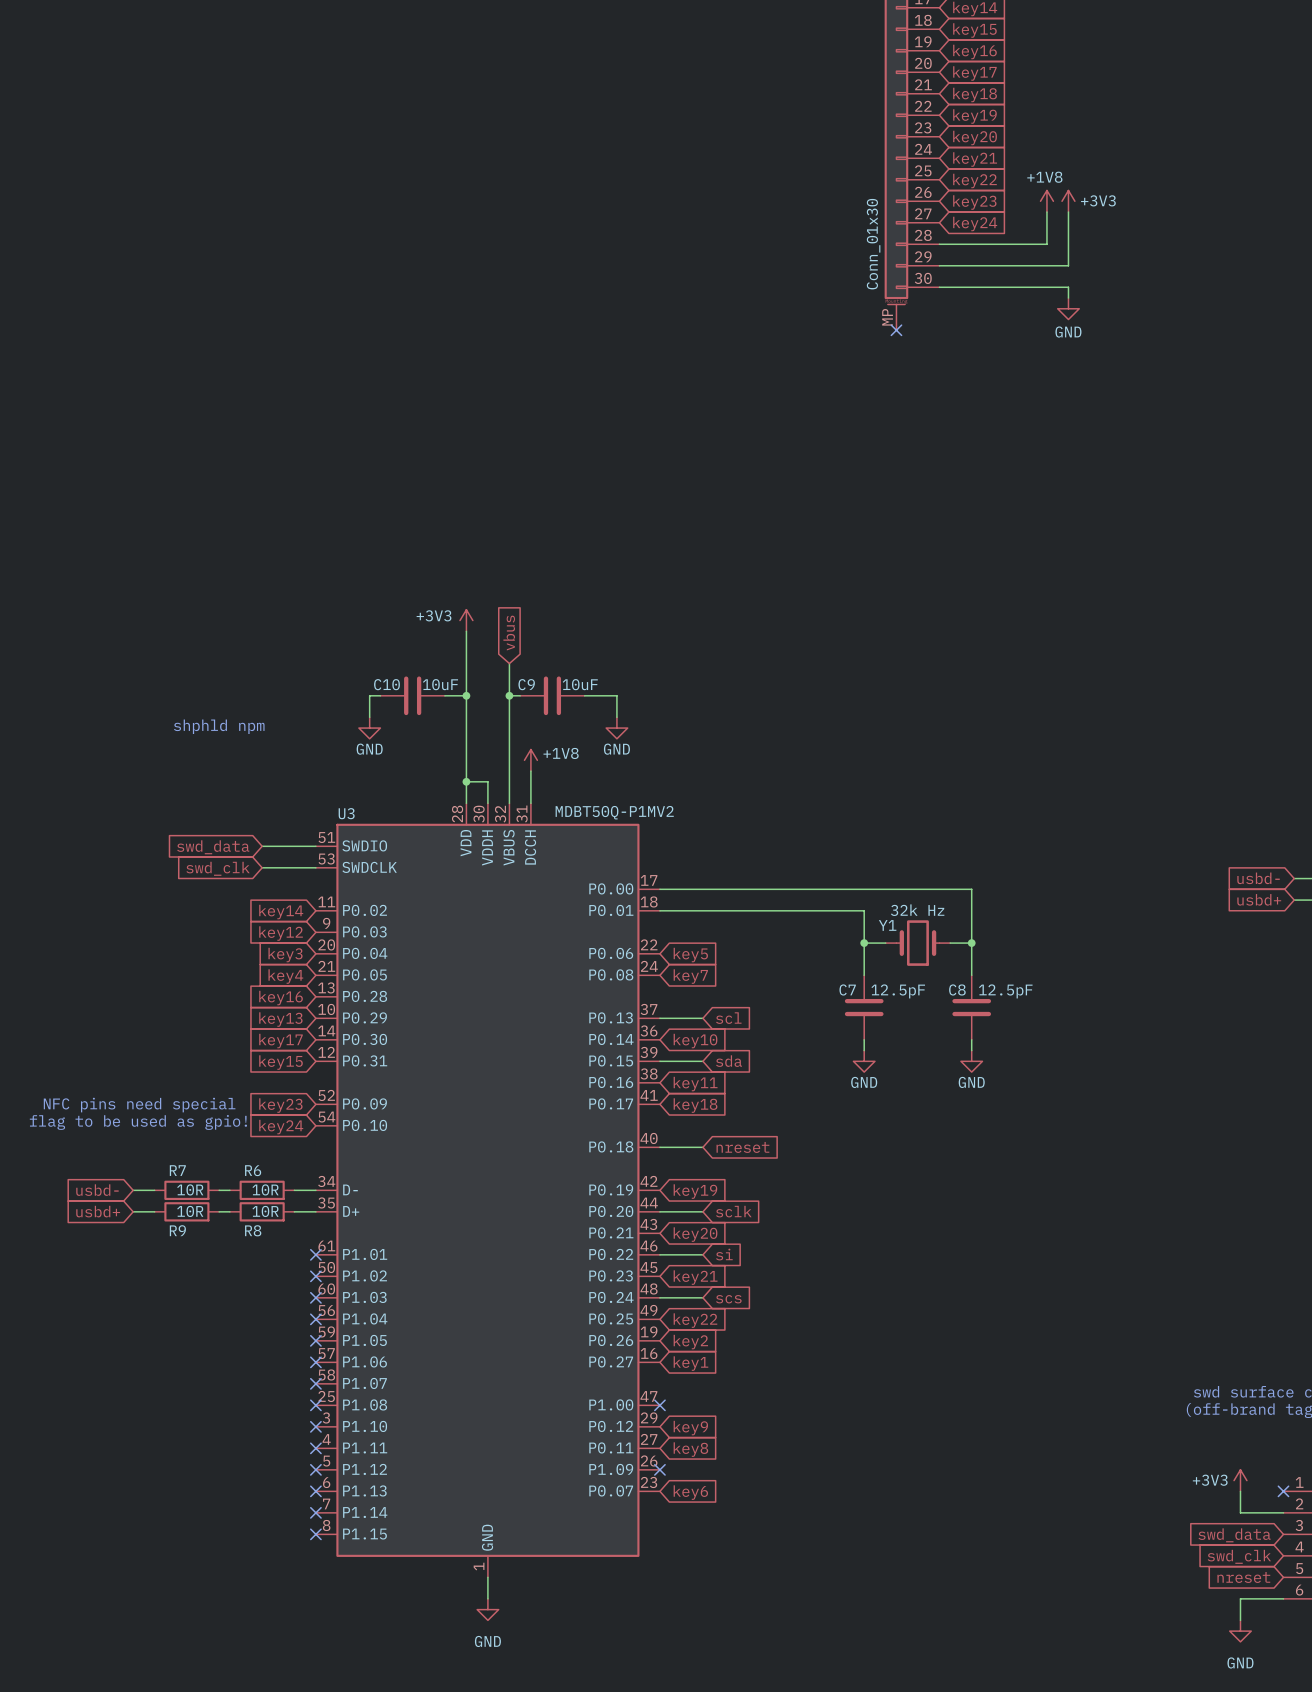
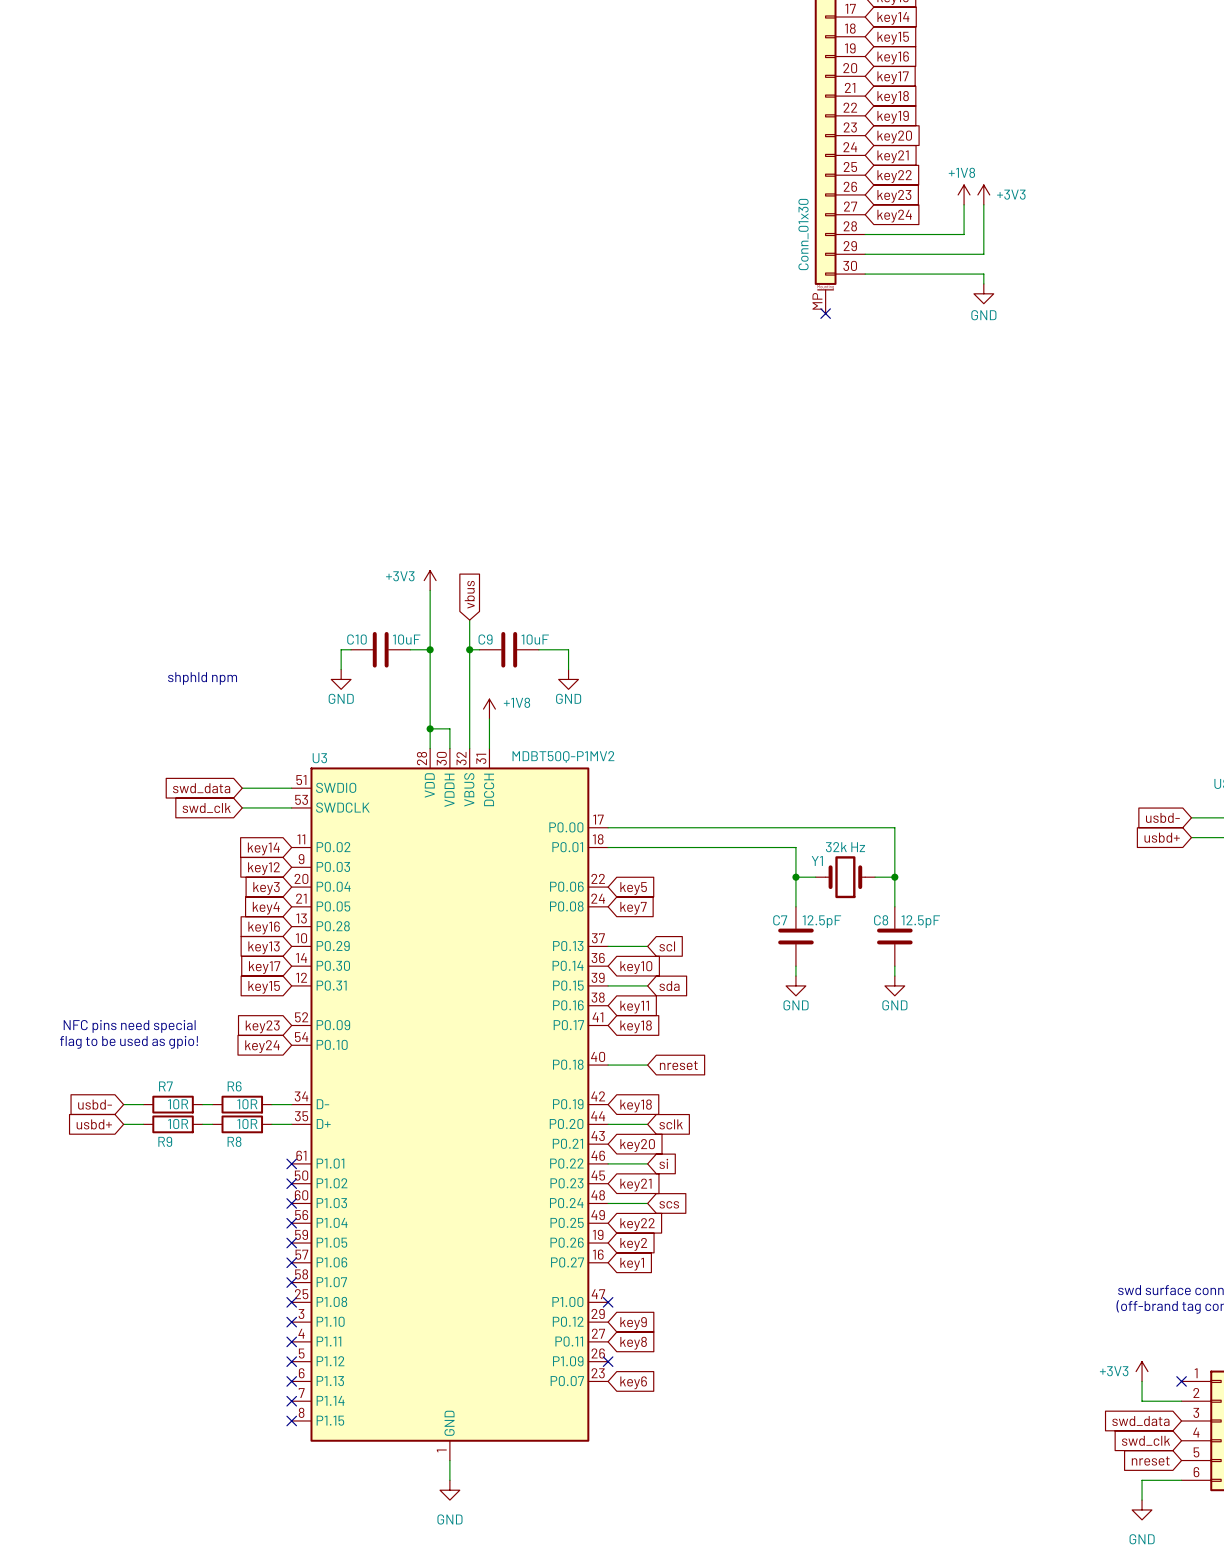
global label: key19 (695, 1191) -> key18 (636, 1105)

